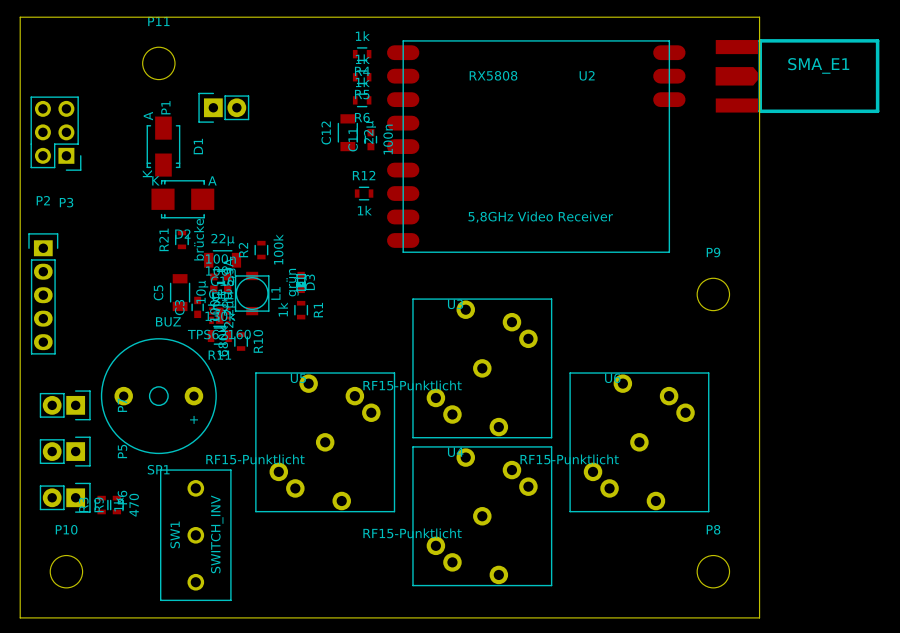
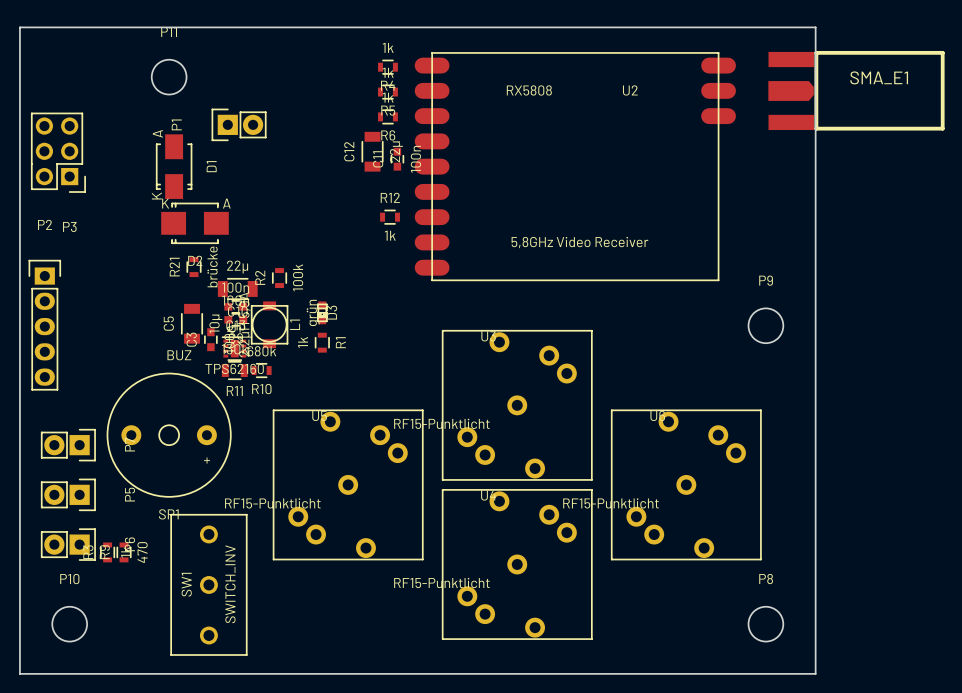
R10 rotation: 0° (241, 341) -> 90° clockwise (261, 370)

